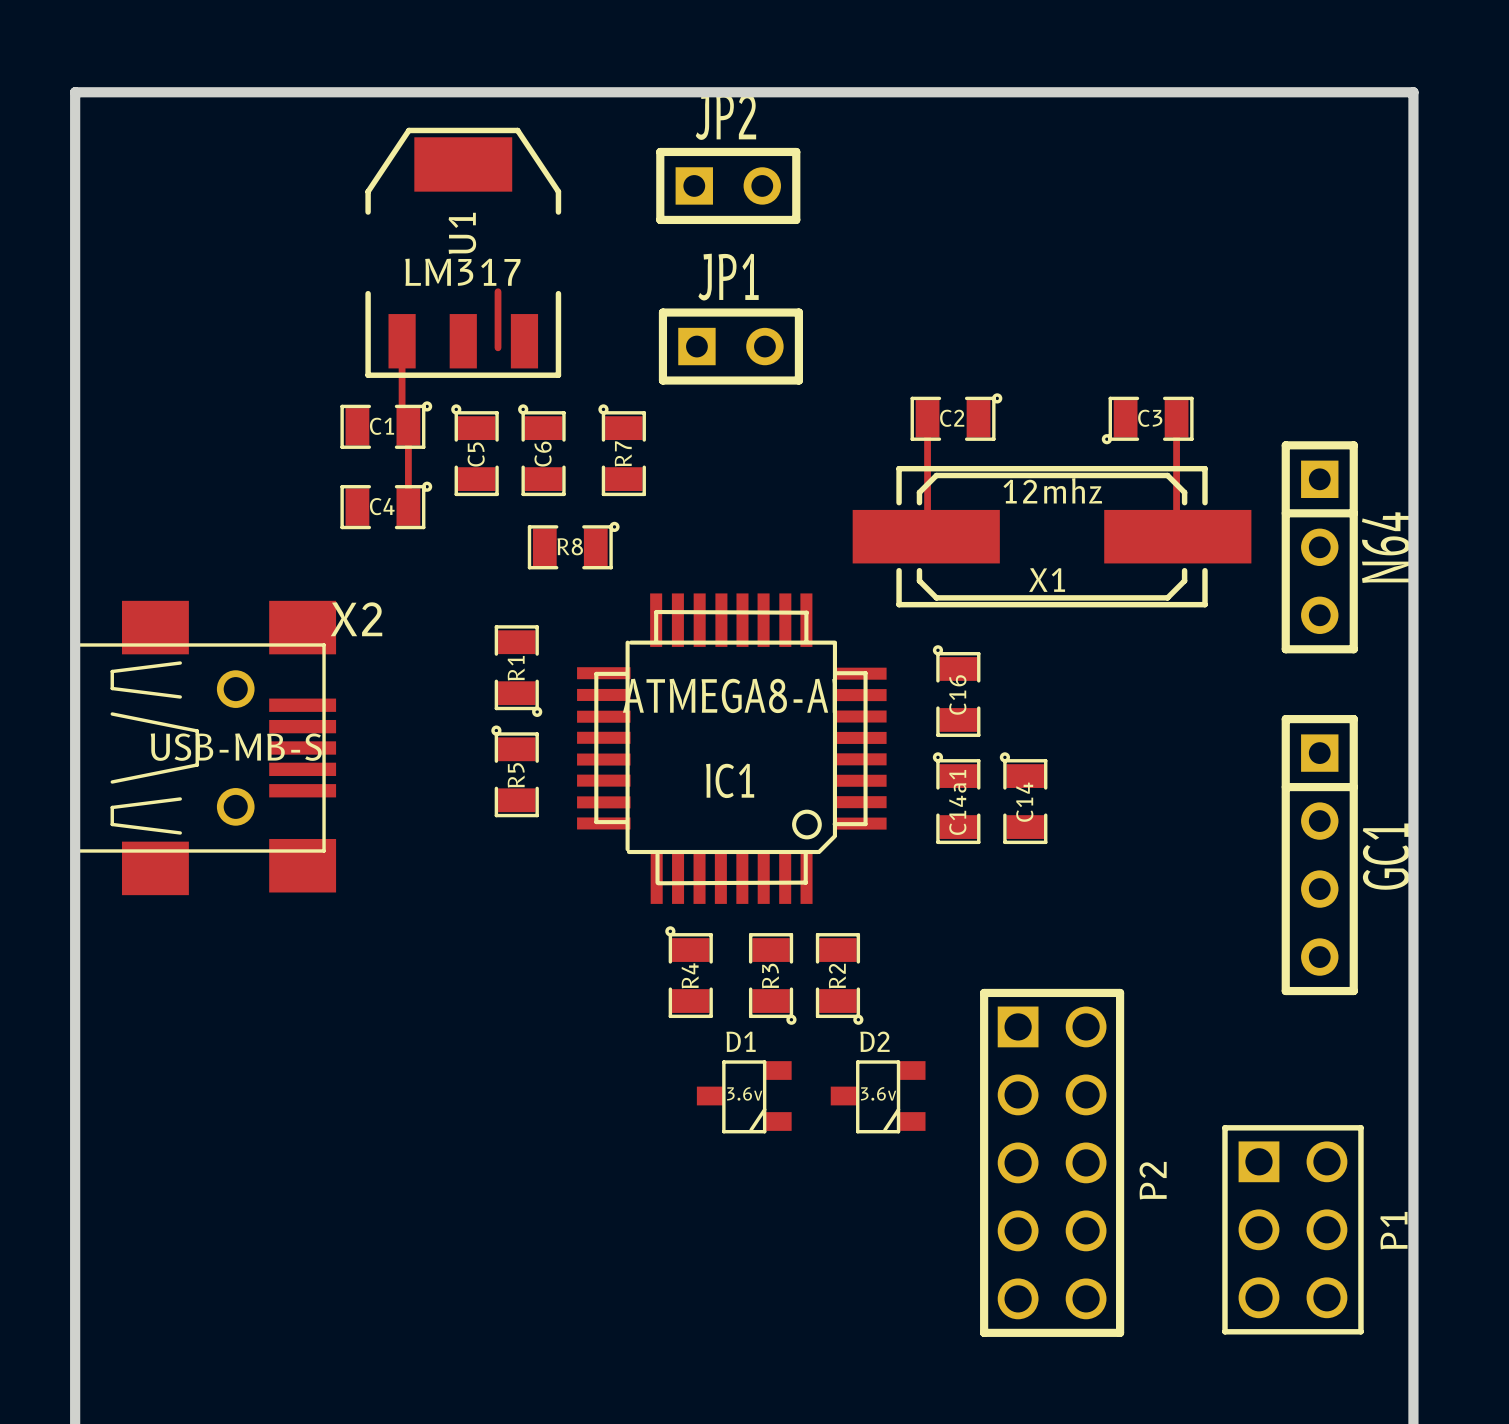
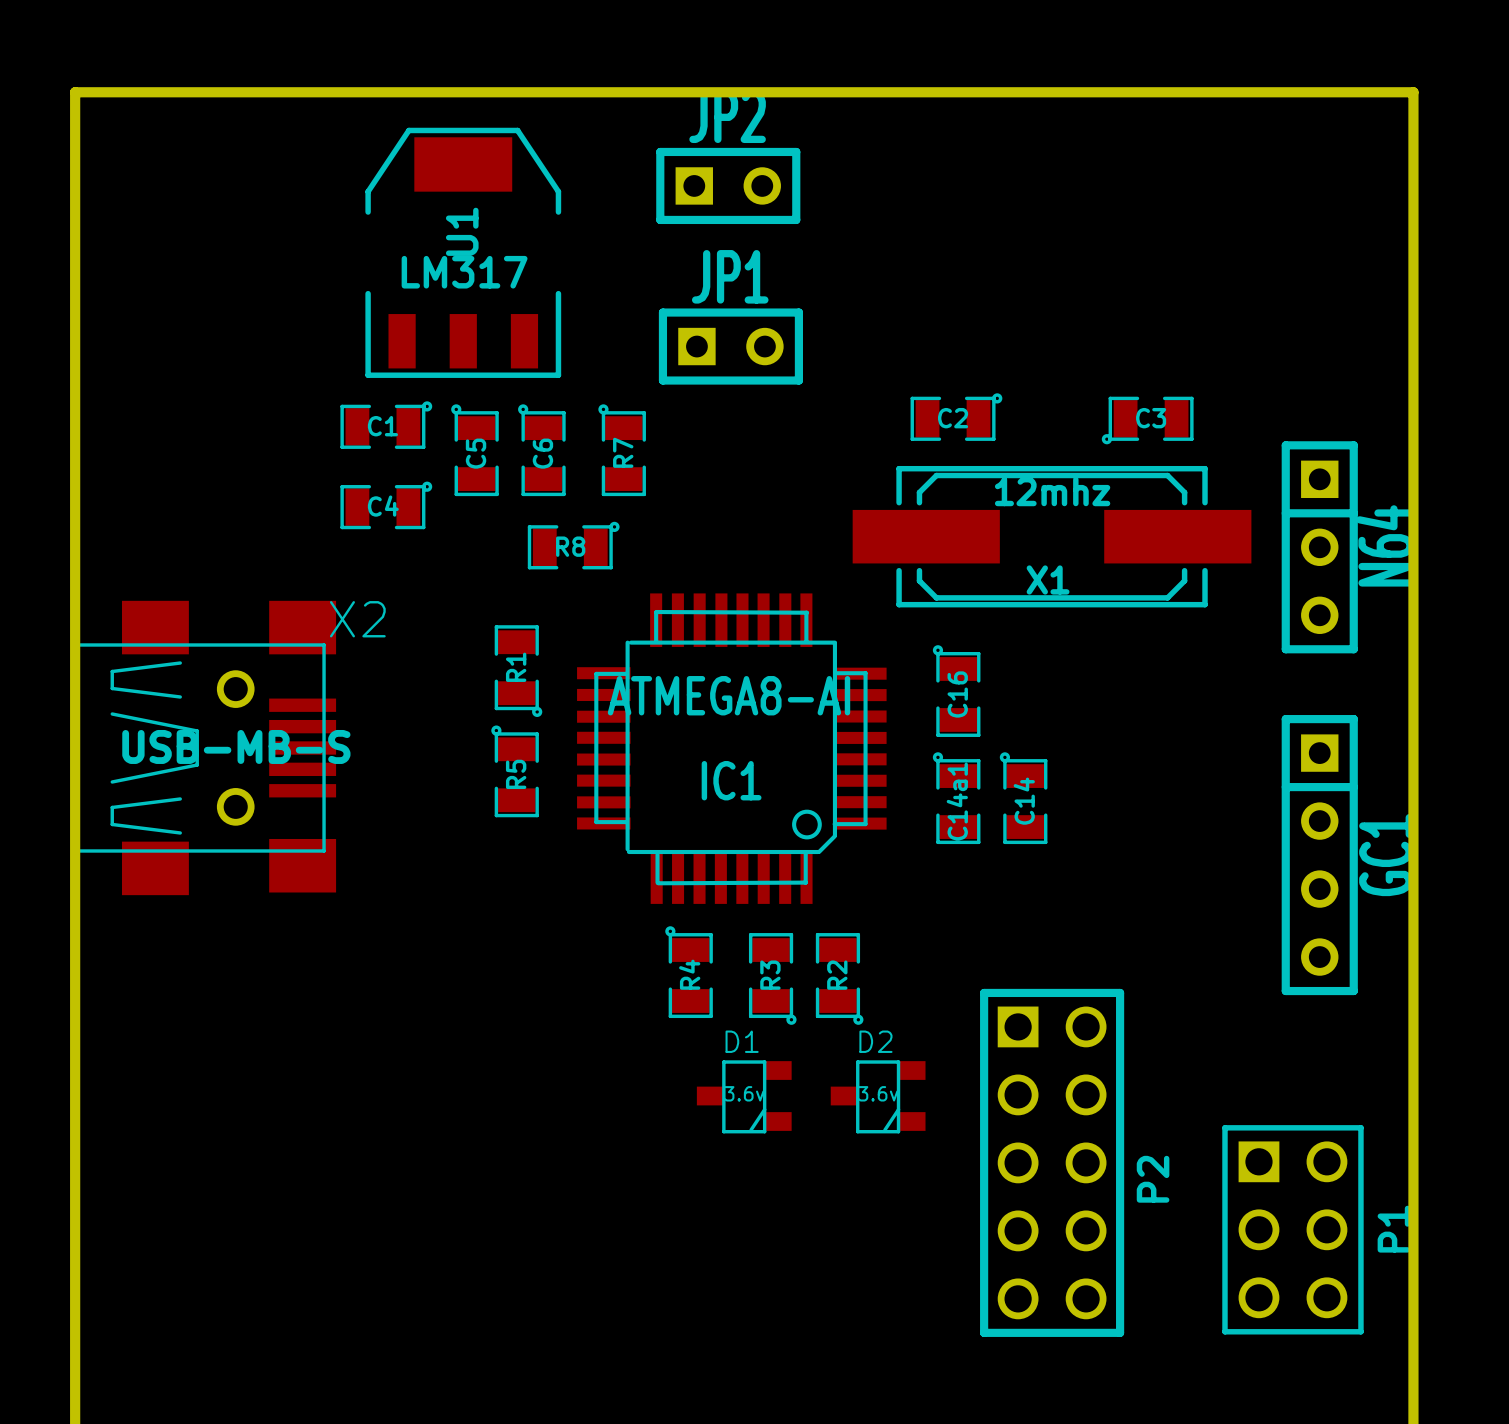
top track: (498, 291) (498, 347) -> none
top track: (402, 341) (402, 420) (408, 426) (408, 507) -> none
top track: (927, 418) (926, 536) -> none
top track: (1176, 418) (1177, 536) -> none

